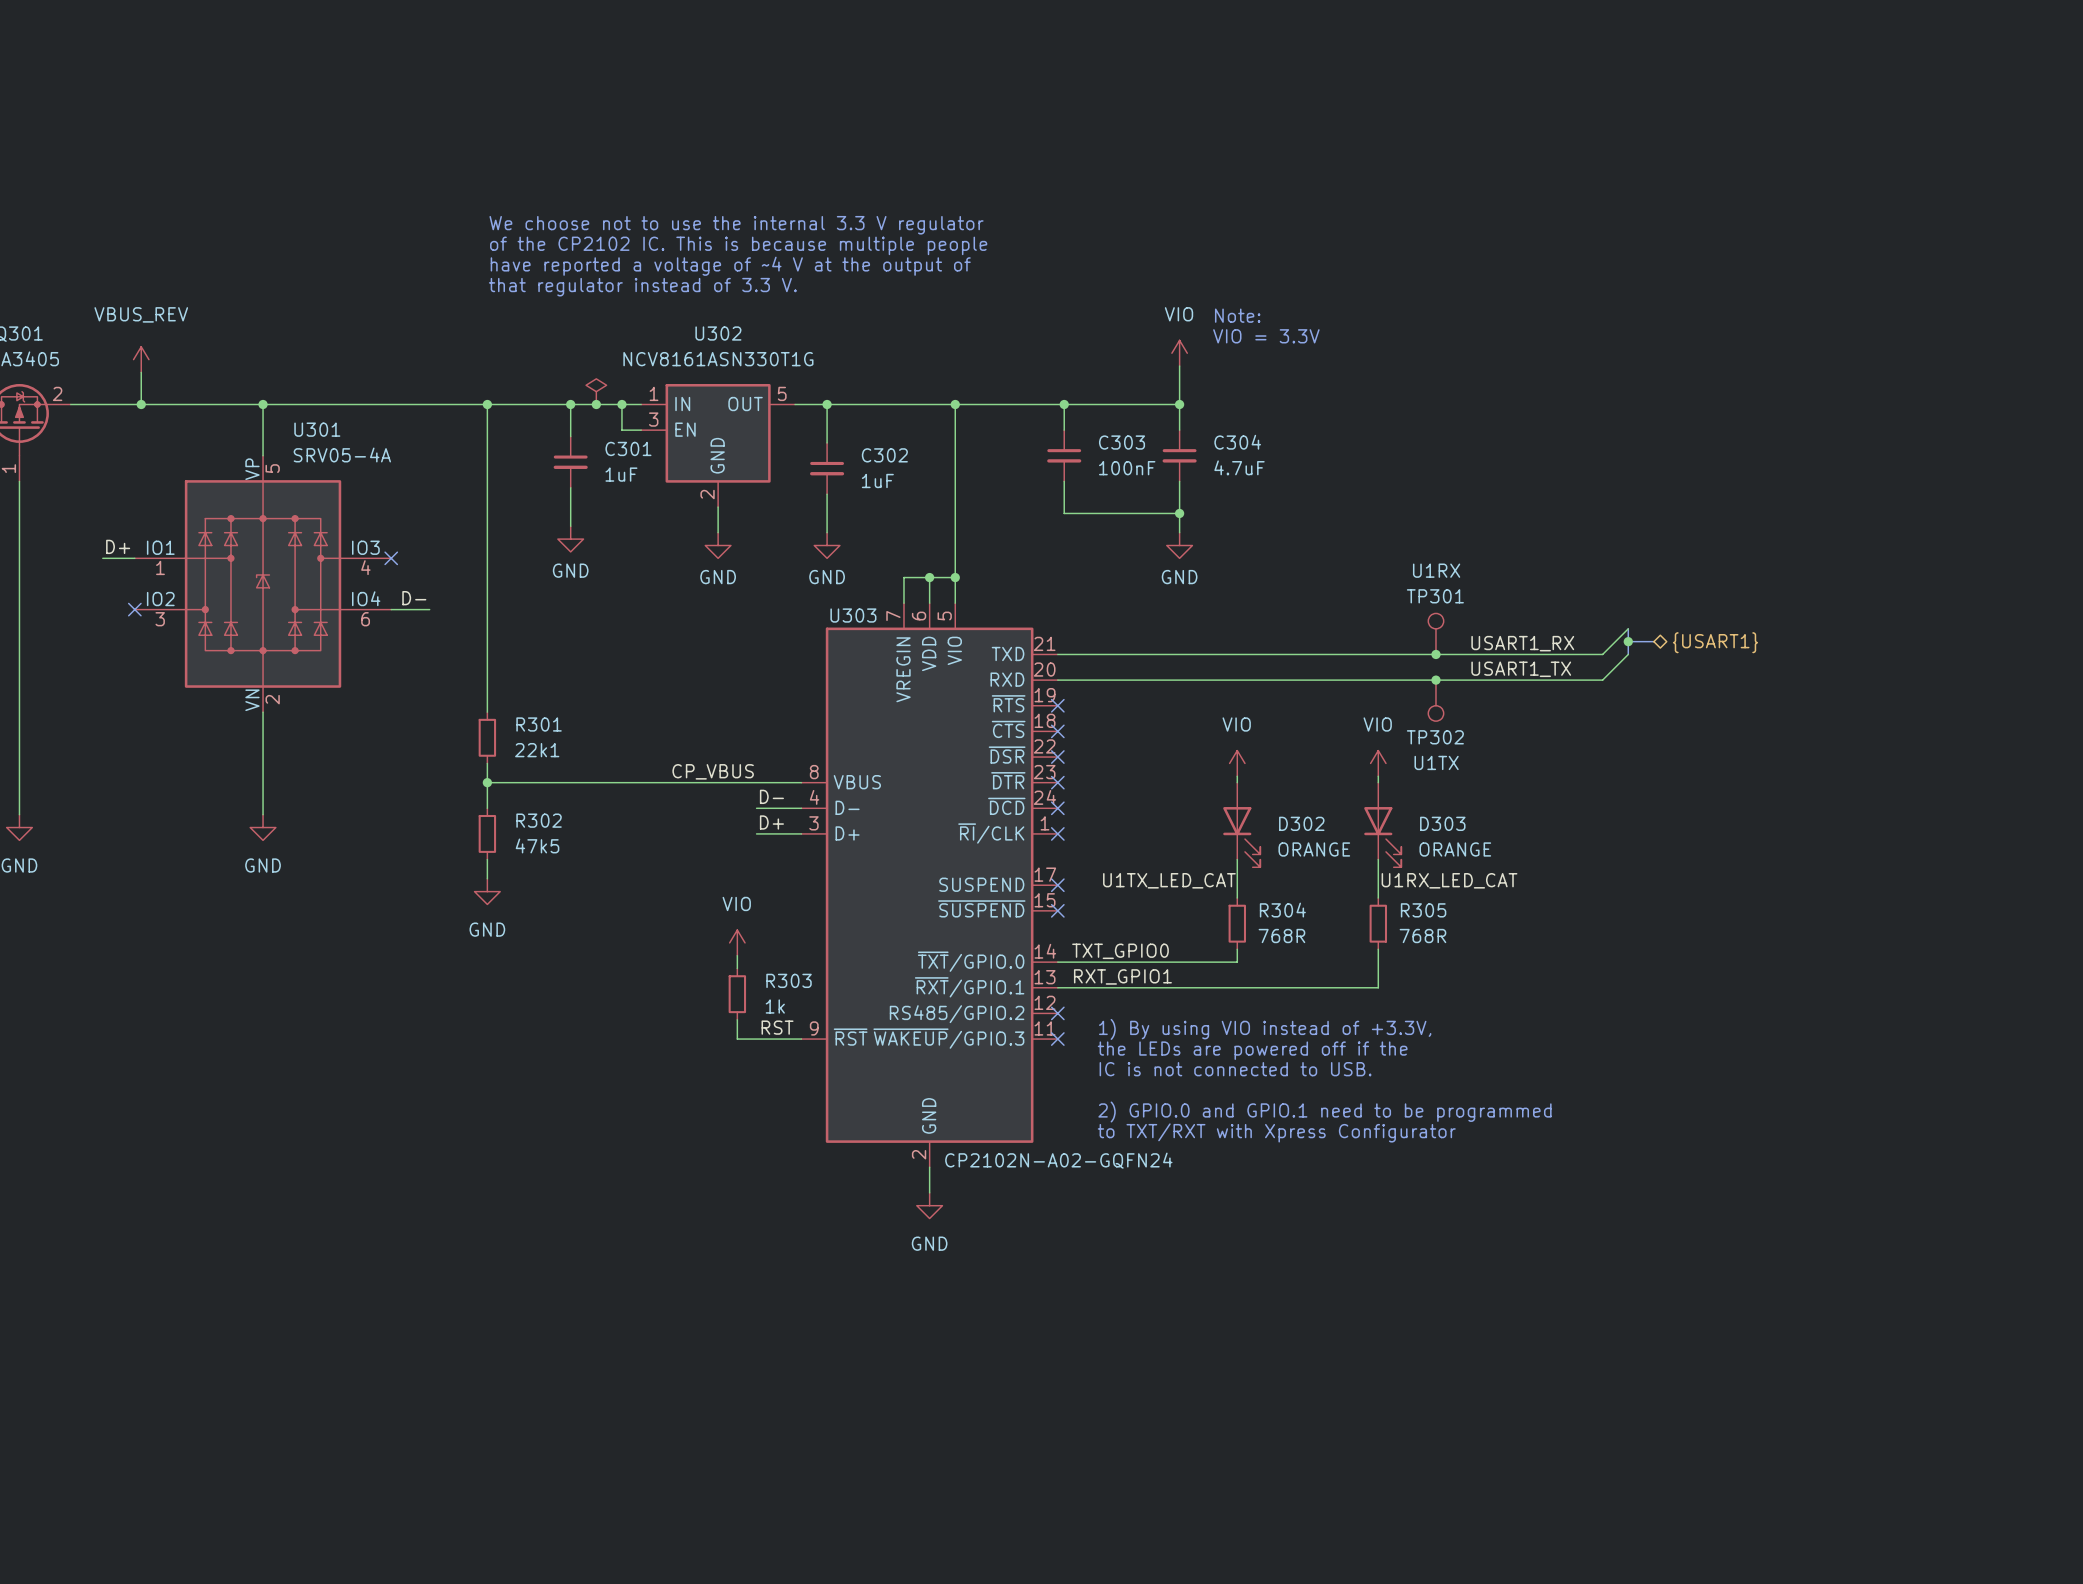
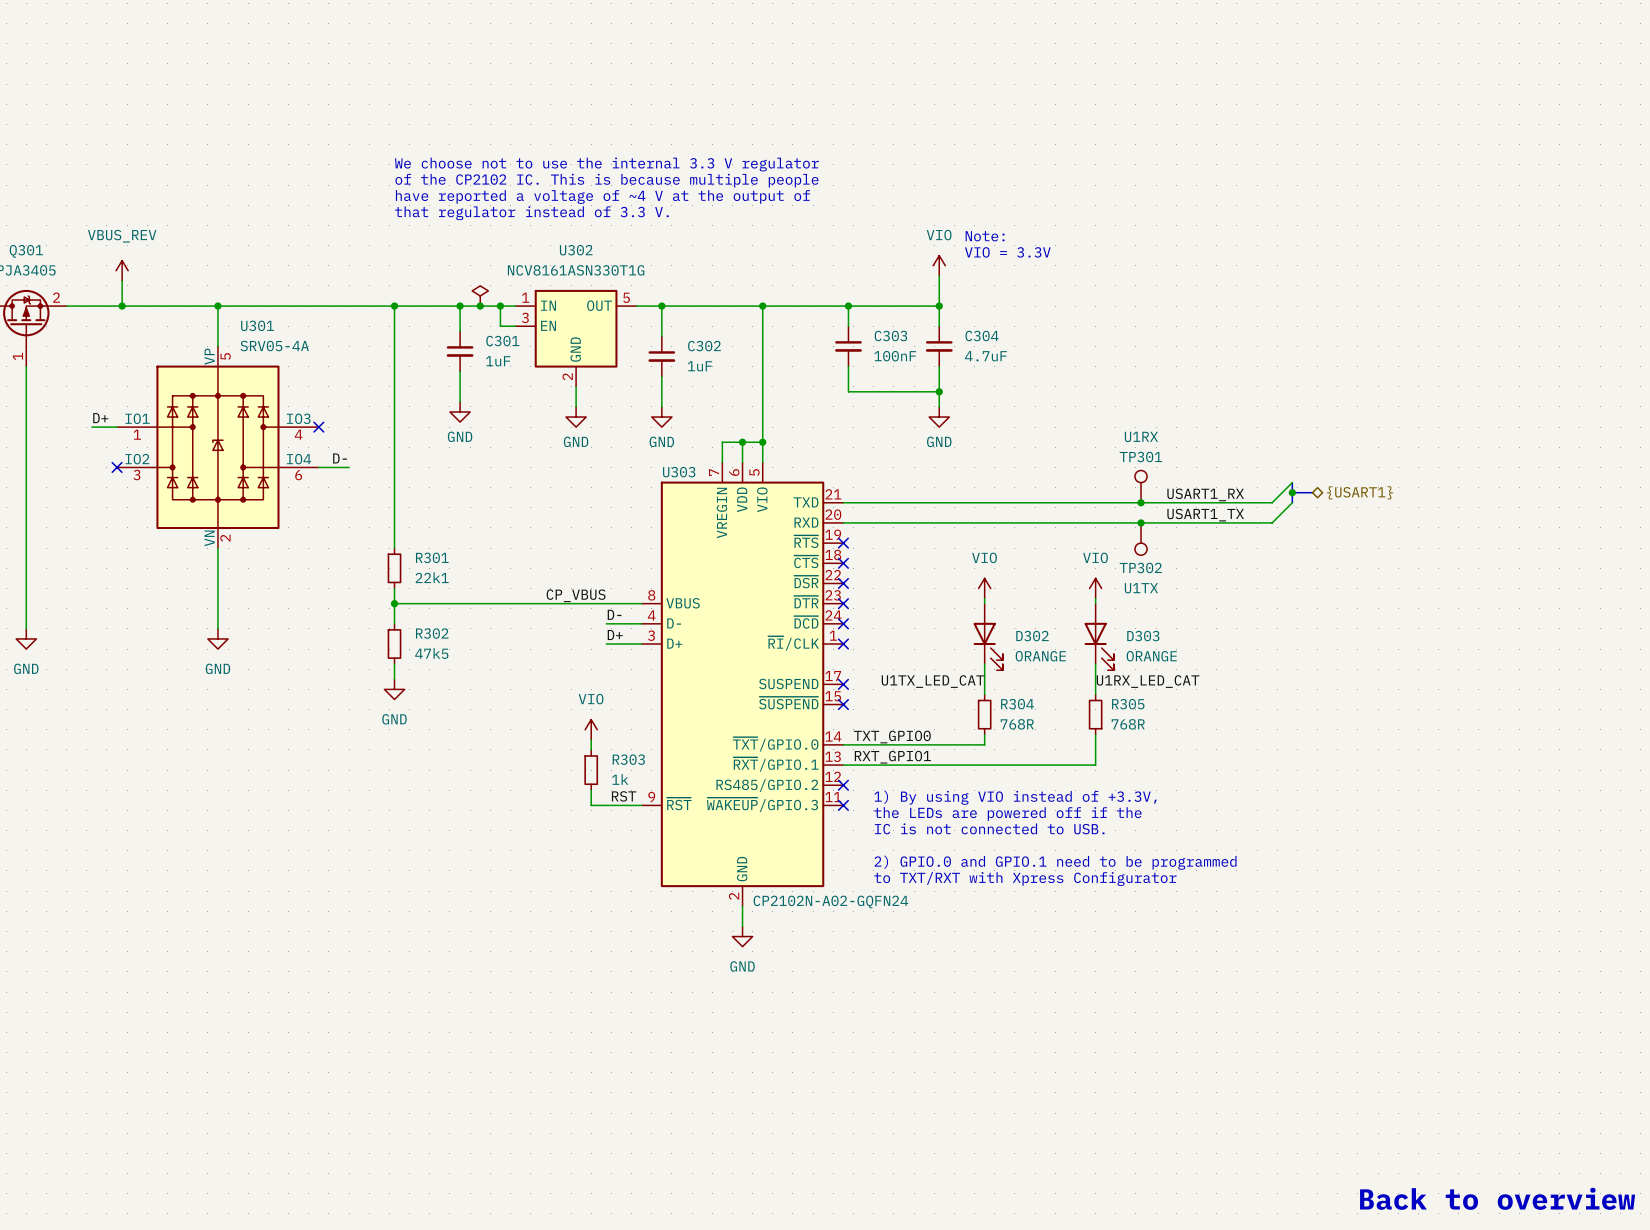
text: none -> Back to overview (1497, 1198)

